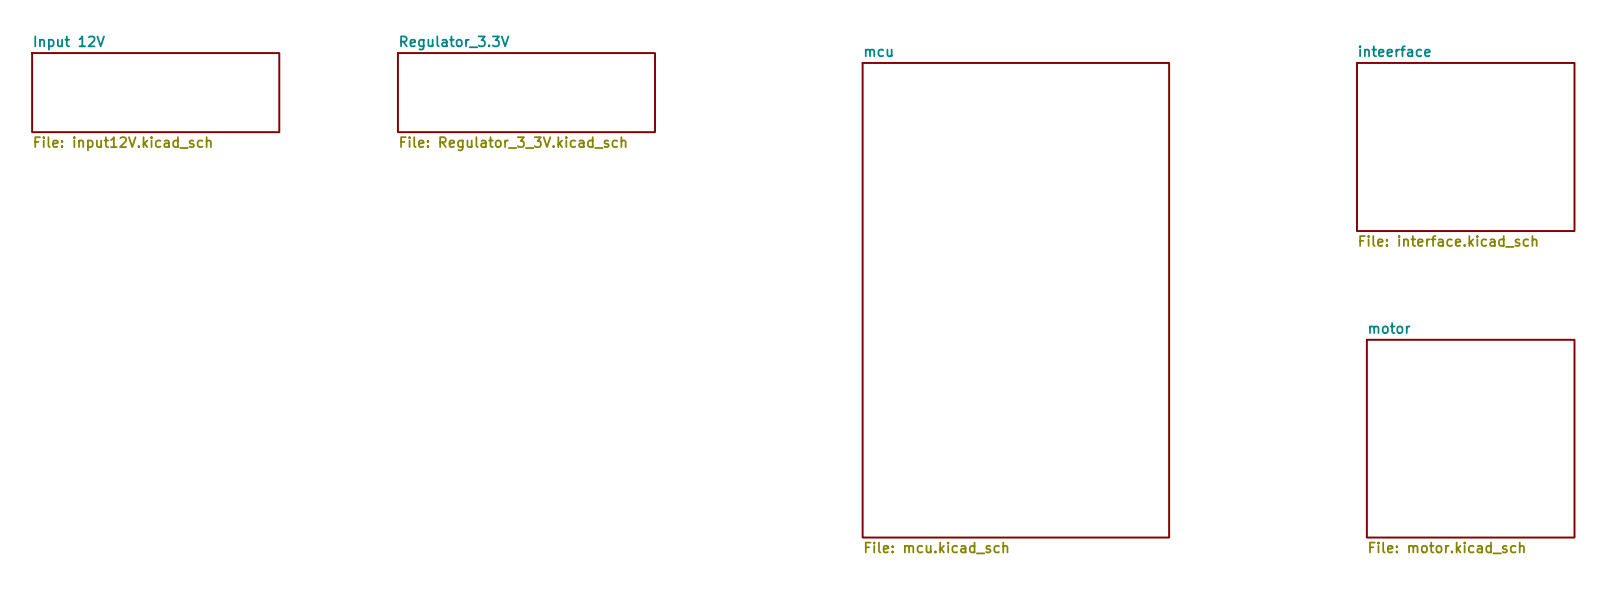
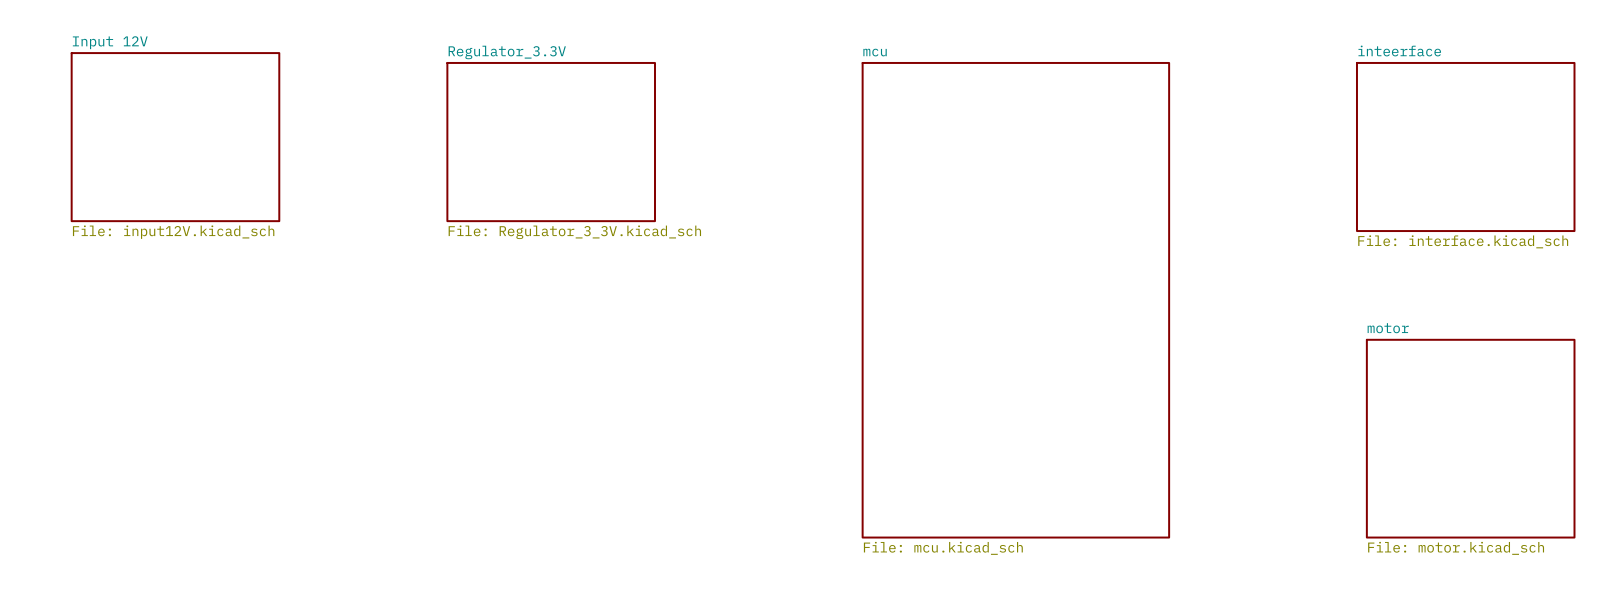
sheet Input 12V name position: Input 12V (69, 43) -> Input 12V (110, 42)
sheet Regulator_3.3V name position: Regulator_3.3V (454, 43) -> Regulator_3.3V (507, 52)
sheet Input 12V shape: [31, 52, 280, 133] -> [71, 52, 280, 222]
sheet Regulator_3.3V shape: [397, 52, 656, 133] -> [446, 62, 656, 222]
sheet Input 12V value position: File: input12V.kicad_sch (123, 143) -> File: input12V.kicad_sch (173, 232)
sheet Regulator_3.3V value position: File: Regulator_3_3V.kicad_sch (513, 143) -> File: Regulator_3_3V.kicad_sch (574, 232)

